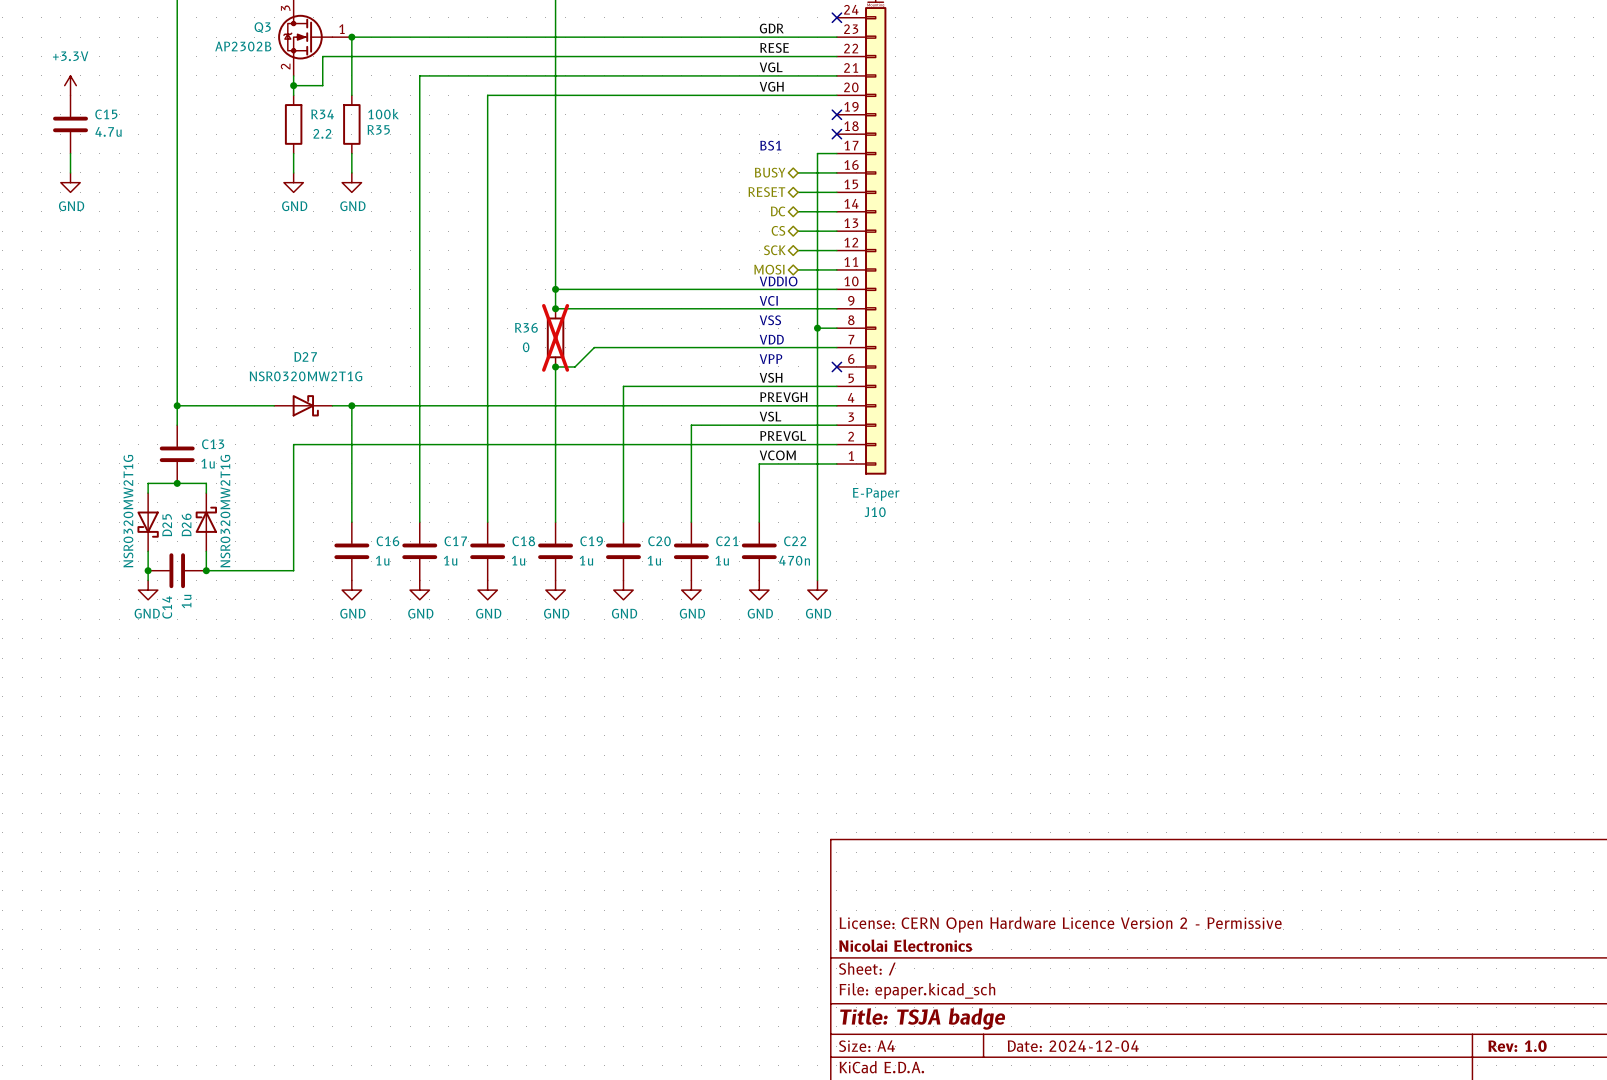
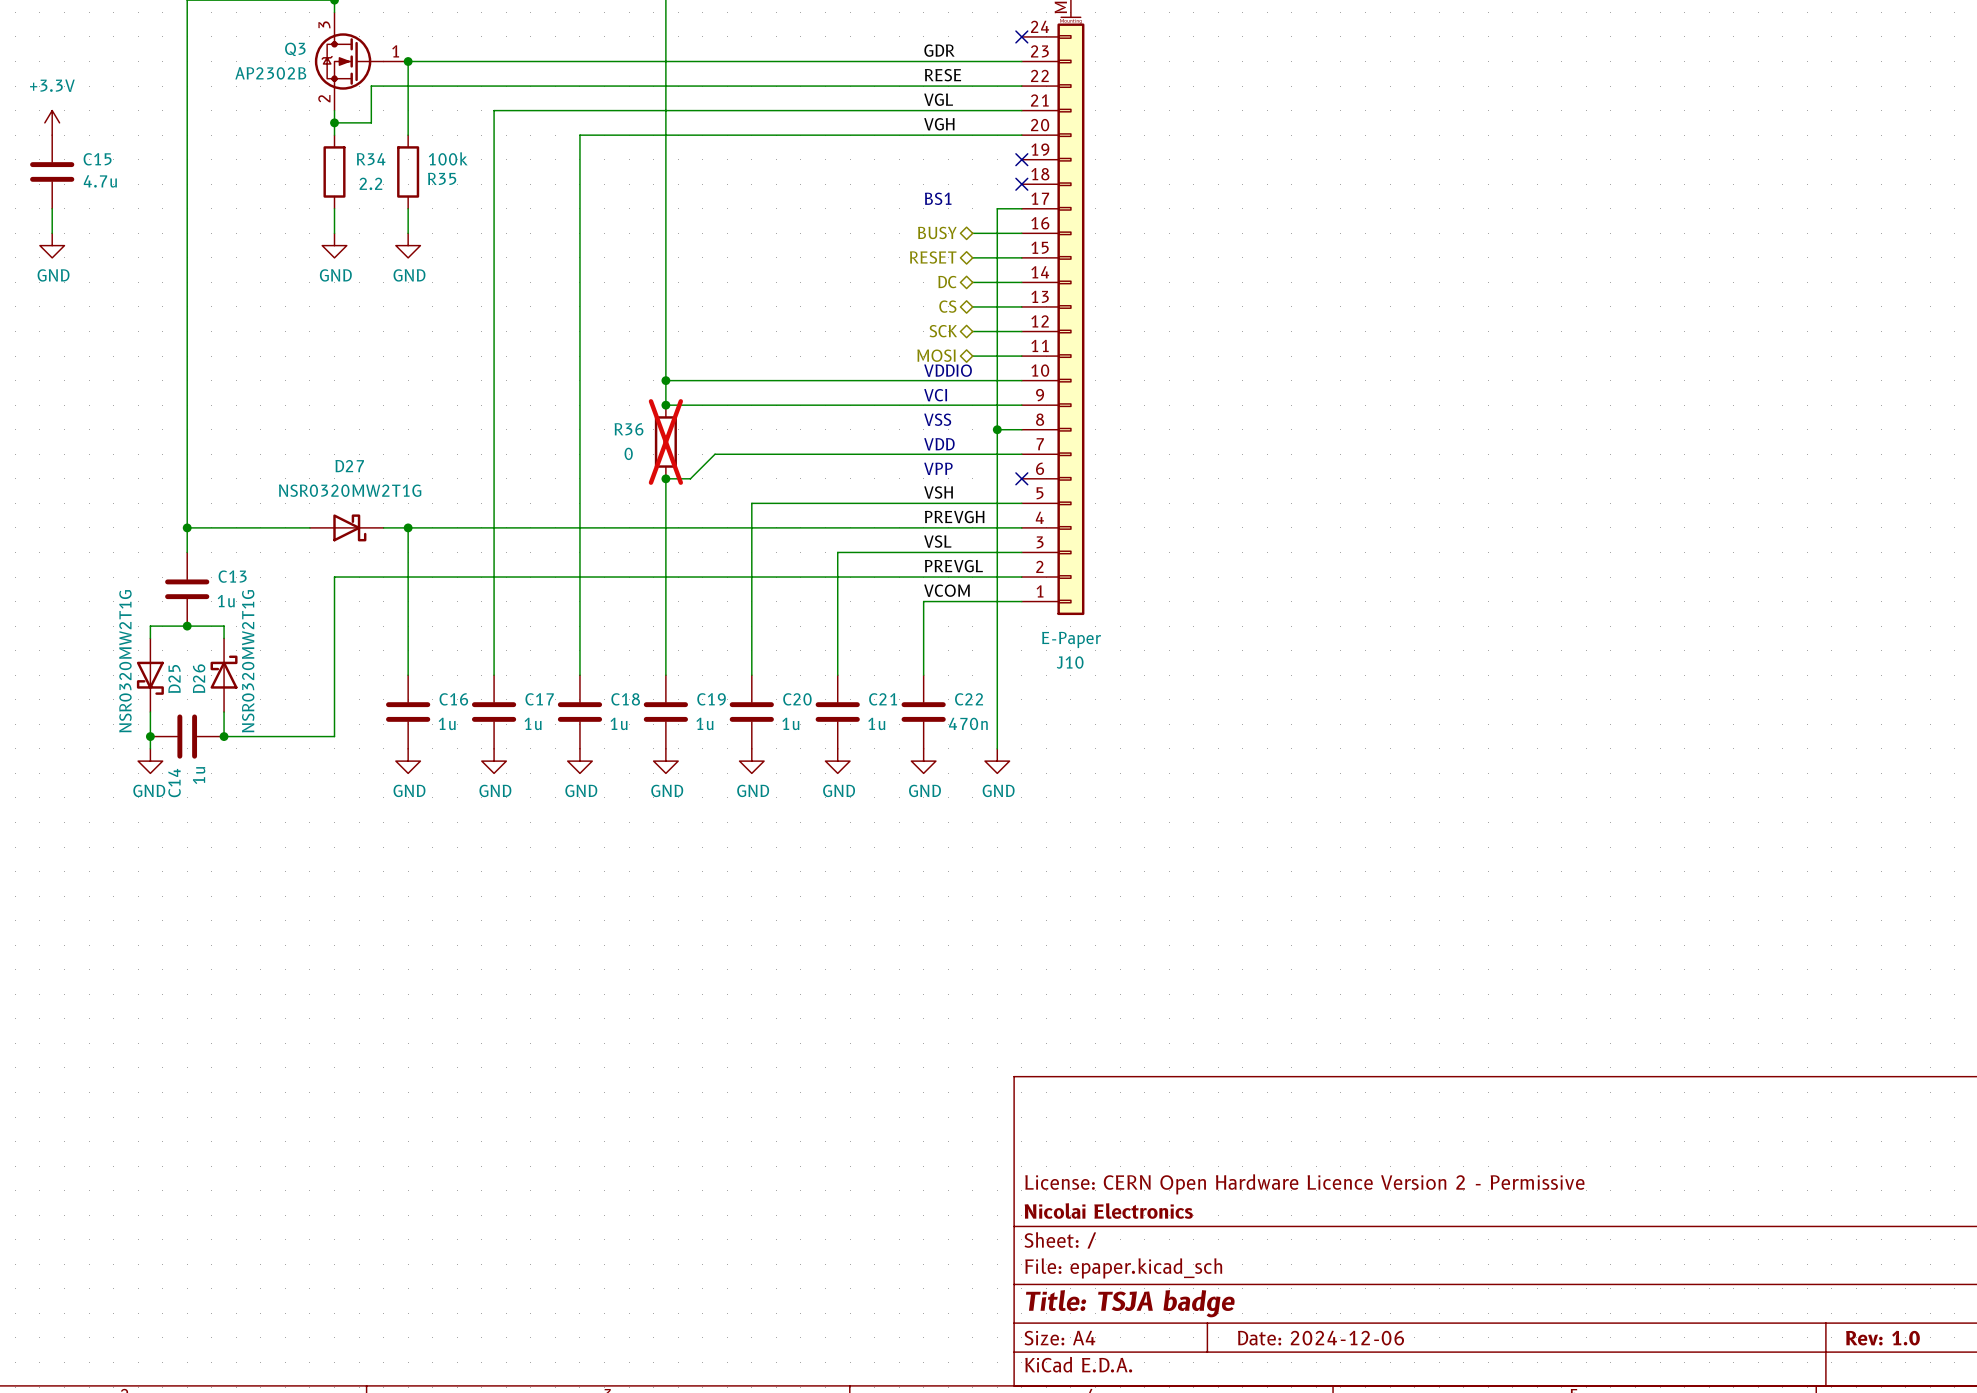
title block: Date: 2024-12-04 (1073, 1046) -> Date: 2024-12-06 (1321, 1338)

